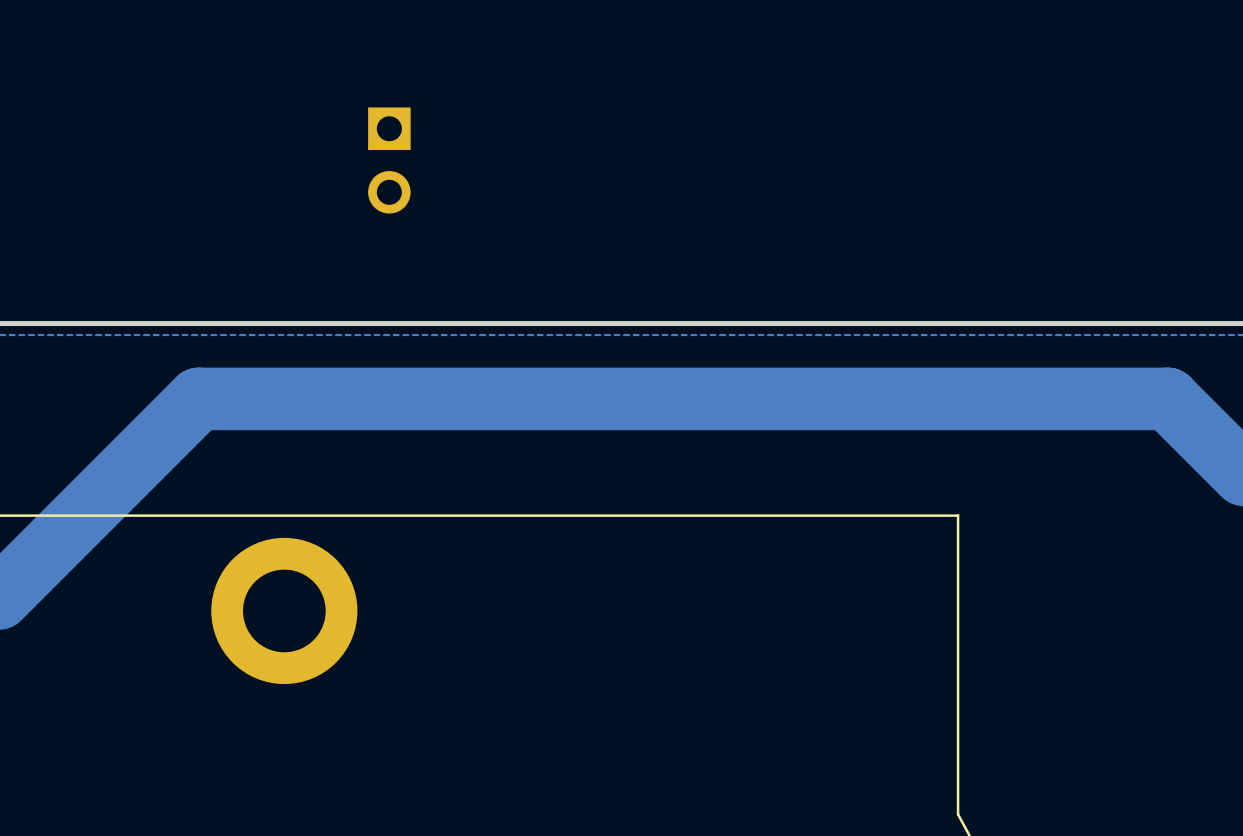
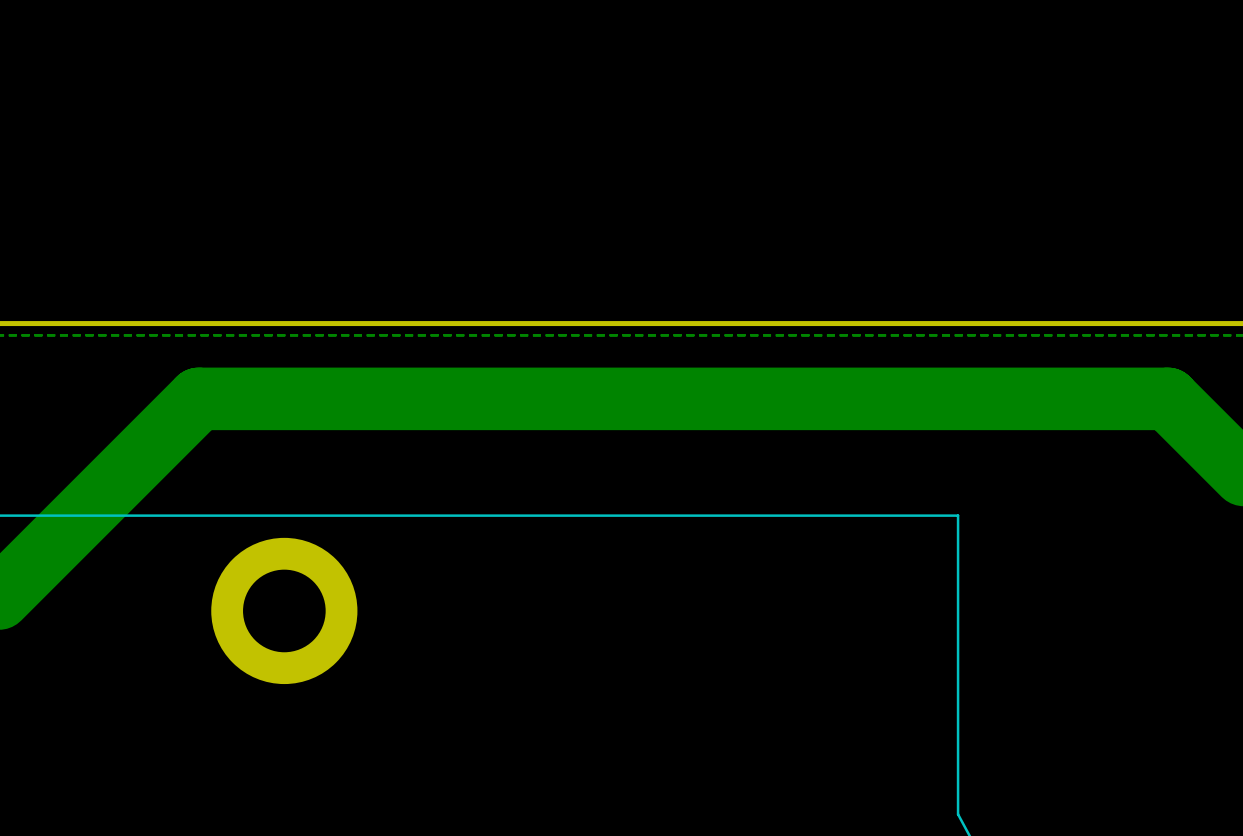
part: (389, 160) -> none

